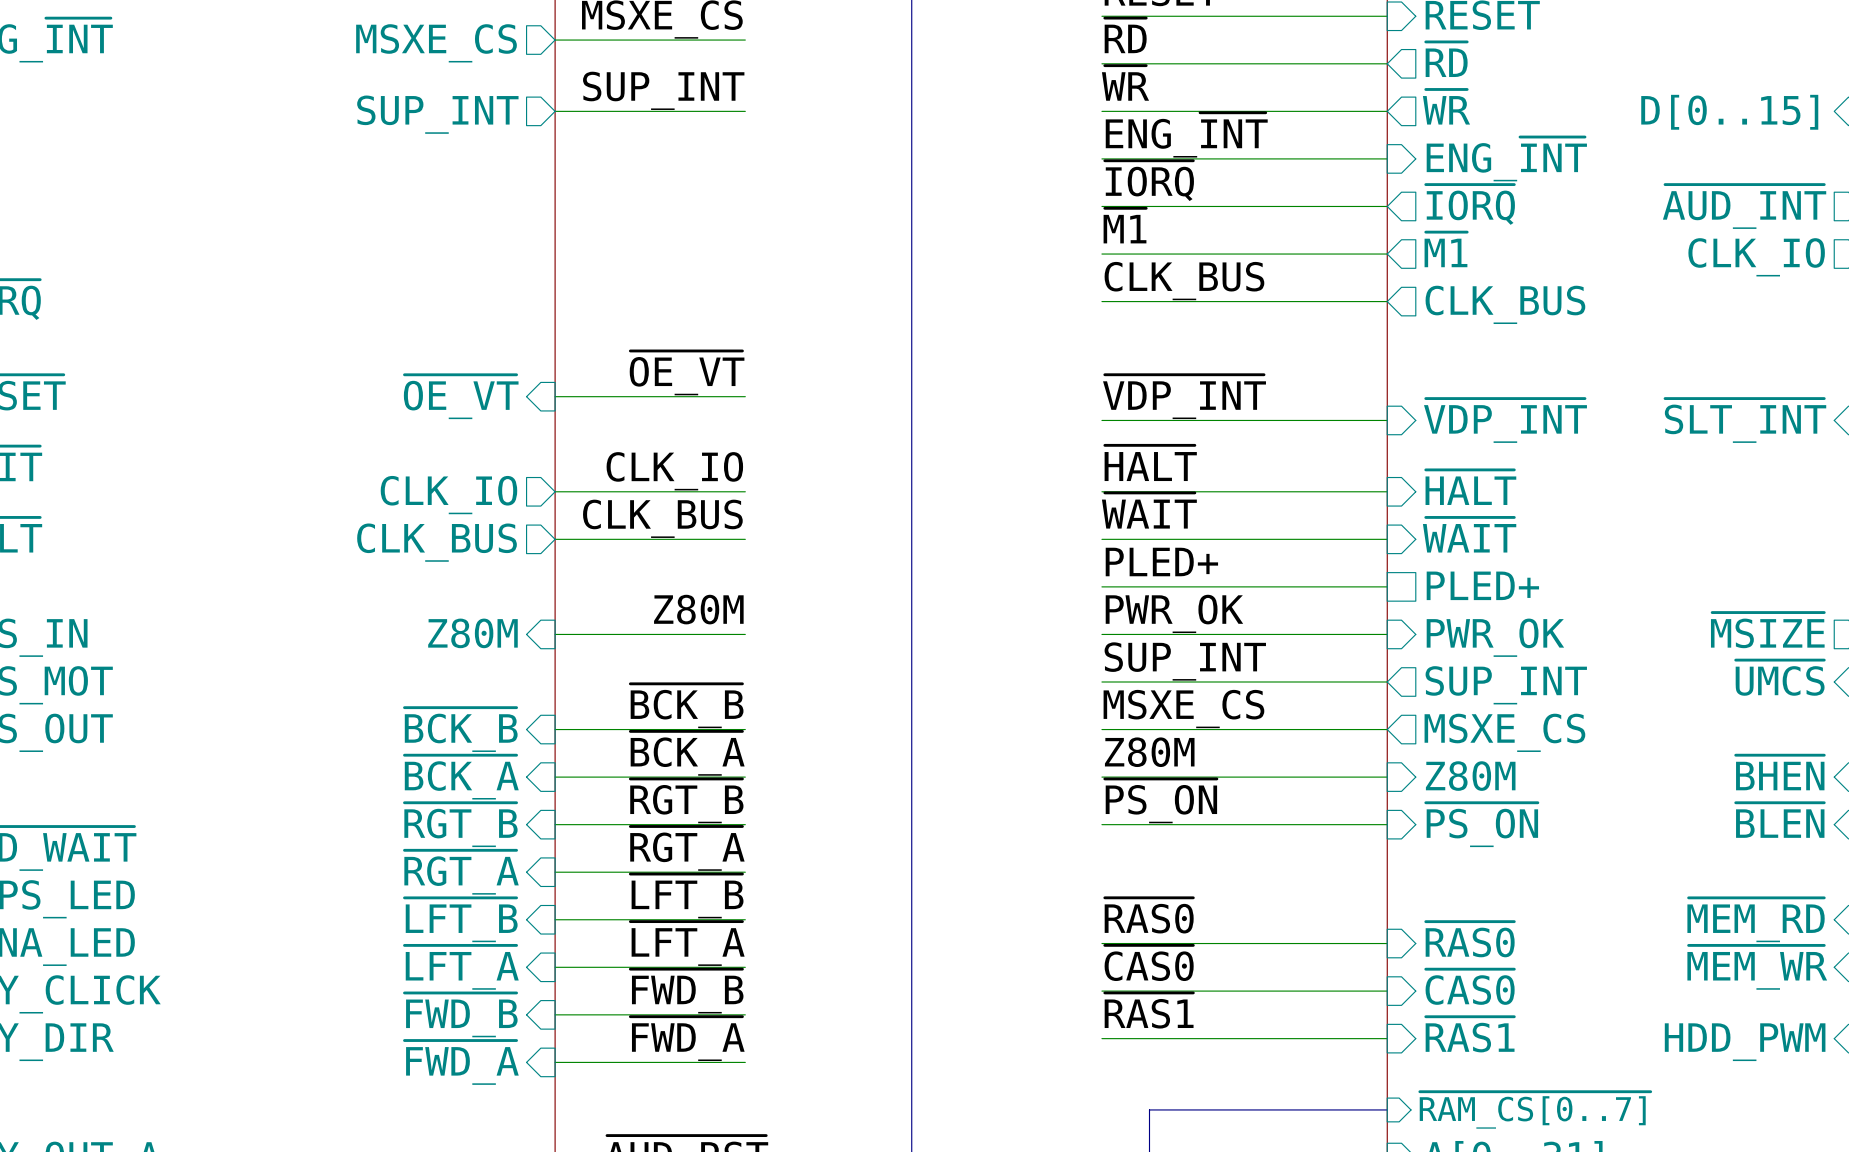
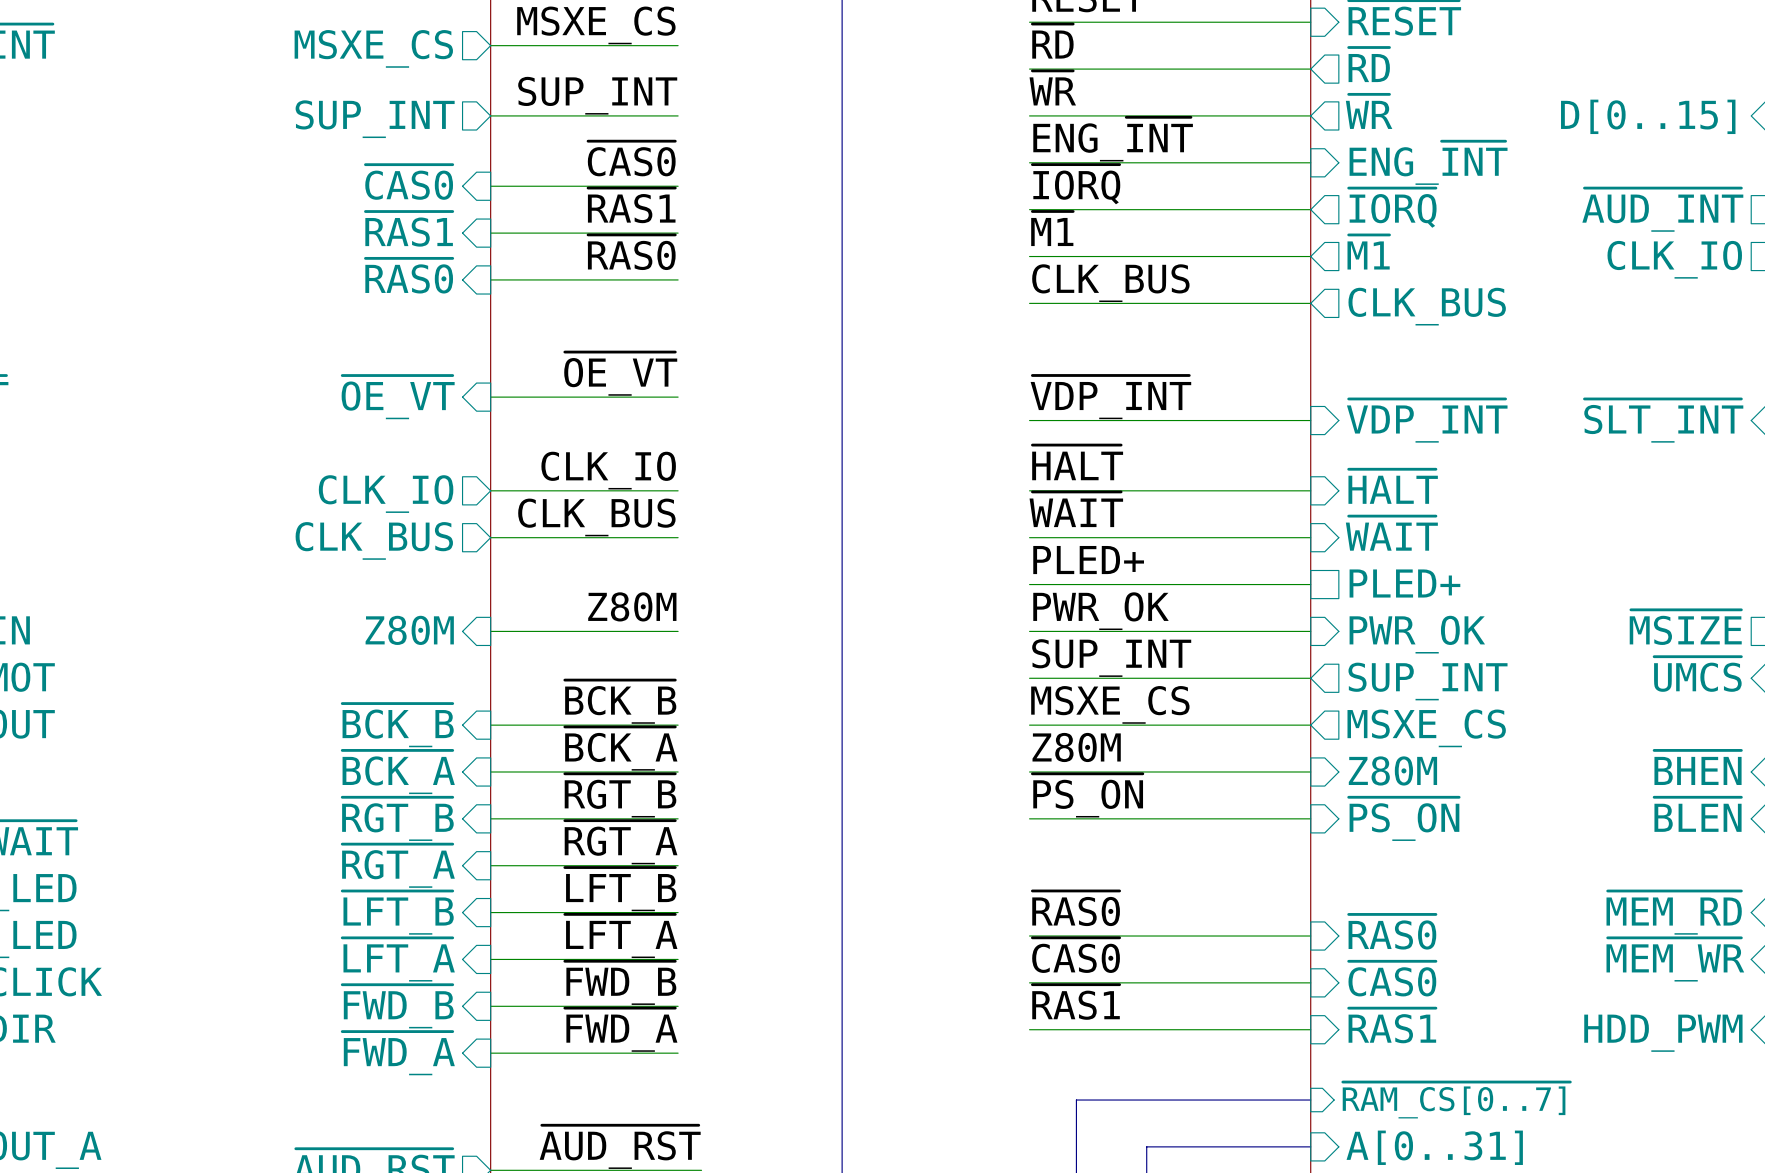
label: none -> ~{CAS0} (631, 158)
sheet pin: none -> ~{CAS0} (409, 182)
wire: none -> (490, 186) (678, 186)
label: none -> ~{RAS1} (631, 205)
sheet pin: none -> ~{RAS1} (409, 229)
wire: none -> (490, 233) (678, 233)
label: none -> ~{RAS0} (631, 252)
sheet pin: none -> ~{RAS0} (409, 275)
wire: none -> (490, 279) (678, 279)

